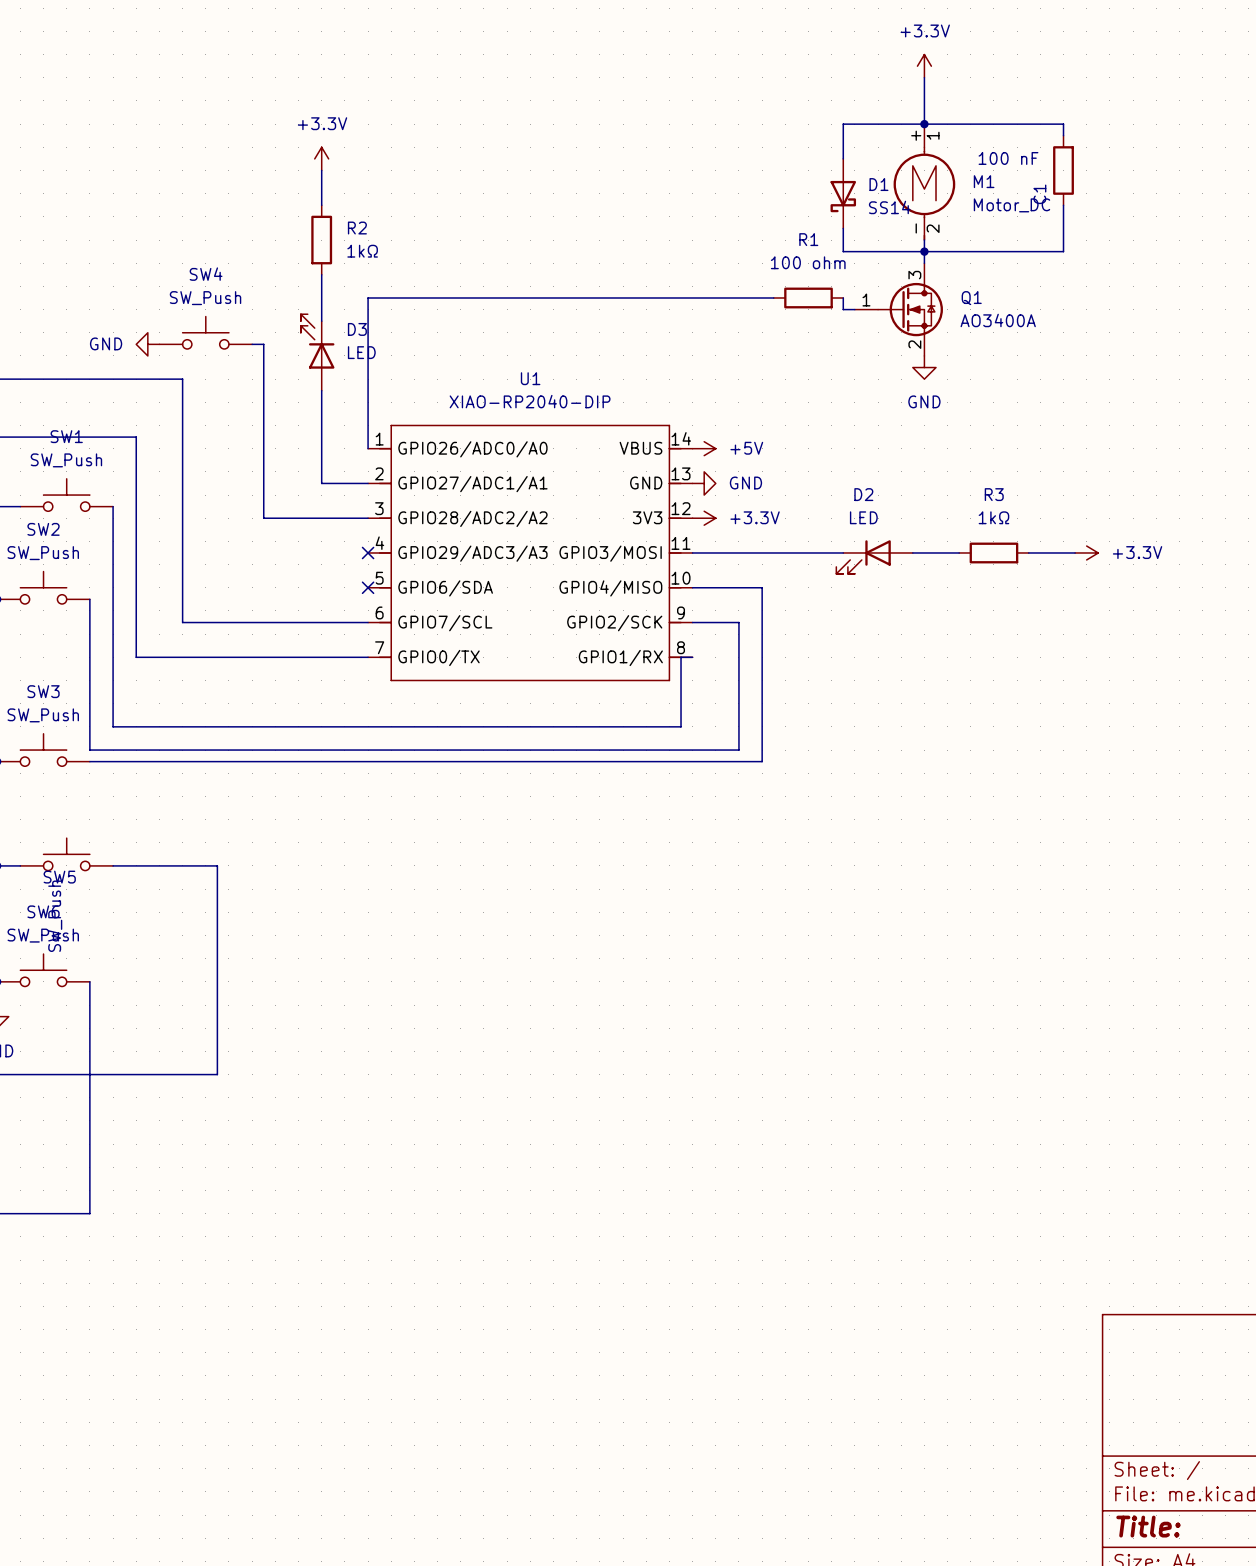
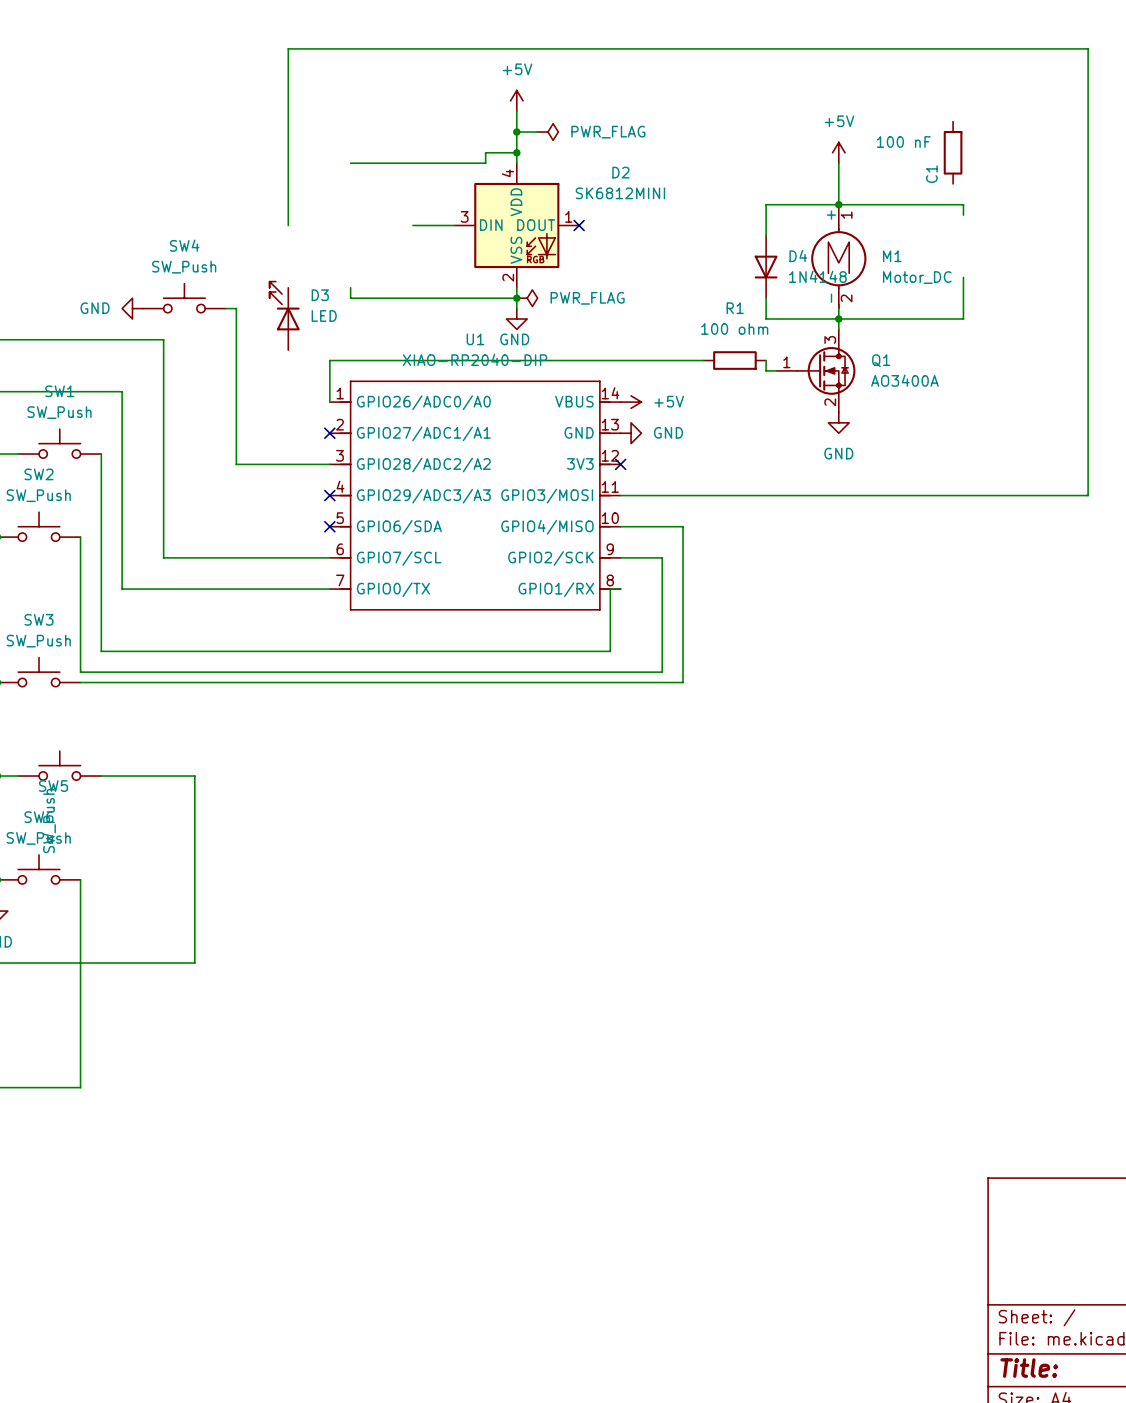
power symbol: +3.3V (924, 66) -> none
wire: (924, 77) (924, 124) -> (838, 163) (838, 204)
power symbol: none -> +5V (516, 100)
wire: none -> (516, 111) (516, 163)
junction: (924, 124) -> none
wire: (1063, 135) (1063, 124) (843, 124) (843, 158) -> (963, 215) (963, 204) (766, 204) (766, 235)
wire: none -> (516, 132) (537, 132)
junction: none -> (516, 132)
power symbol: none -> PWR_FLAG (547, 132)
power symbol: +3.3V (321, 158) -> none
wire: none -> (288, 152) (288, 48) (1088, 48) (1088, 495) (963, 495)
wire: none -> (516, 152) (485, 152) (485, 163) (350, 163)
junction: none -> (516, 152)
power symbol: none -> +5V (838, 152)
M1 position: (924, 182) -> (838, 256)
D1: SS14 (843, 193) -> none
wire: (1063, 205) (1063, 251) (843, 251) (843, 228) -> (963, 277) (963, 318) (766, 318) (766, 298)
R2: 1kΩ (321, 240) -> none
wire: (924, 240) (924, 263) -> (838, 308) (838, 329)
wire: none -> (412, 225) (454, 225)
no-connect mark: none -> (579, 225)
junction position: (924, 251) -> (838, 204)
wire: (321, 274) (321, 321) -> (288, 183) (288, 225)
wire: (773, 297) (368, 297) (368, 402) -> (703, 360) (329, 360)
R1 position: (808, 297) -> (734, 360)
wire: (843, 297) (843, 309) (854, 309) -> (766, 360) (766, 370) (776, 370)
D4: none -> 1N4148 (766, 267)
Q1 position: (898, 309) -> (815, 370)
wire: none -> (350, 287) (350, 298) (516, 298)
wire: none -> (516, 287) (516, 308)
junction: none -> (516, 298)
power symbol: none -> PWR_FLAG (527, 298)
power symbol: none -> GND (516, 318)
junction: none -> (838, 318)
power symbol position: GND (924, 367) -> GND (838, 422)
wire: (321, 390) (321, 483) (368, 483) -> none
no-connect mark: none -> (329, 433)
D2 name position: D2 (863, 494) -> D2 (620, 172)
D2 value: LED (863, 517) -> SK6812MINI (620, 193)
no-connect mark: none -> (620, 464)
power symbol: +3.3V (704, 518) -> none
D2 symbol: [836, 540, 913, 574] -> [454, 163, 580, 288]
wire: none -> (859, 495) (921, 495)
R3: 1kΩ (993, 552) -> none
power symbol: +3.3V (1086, 552) -> none

